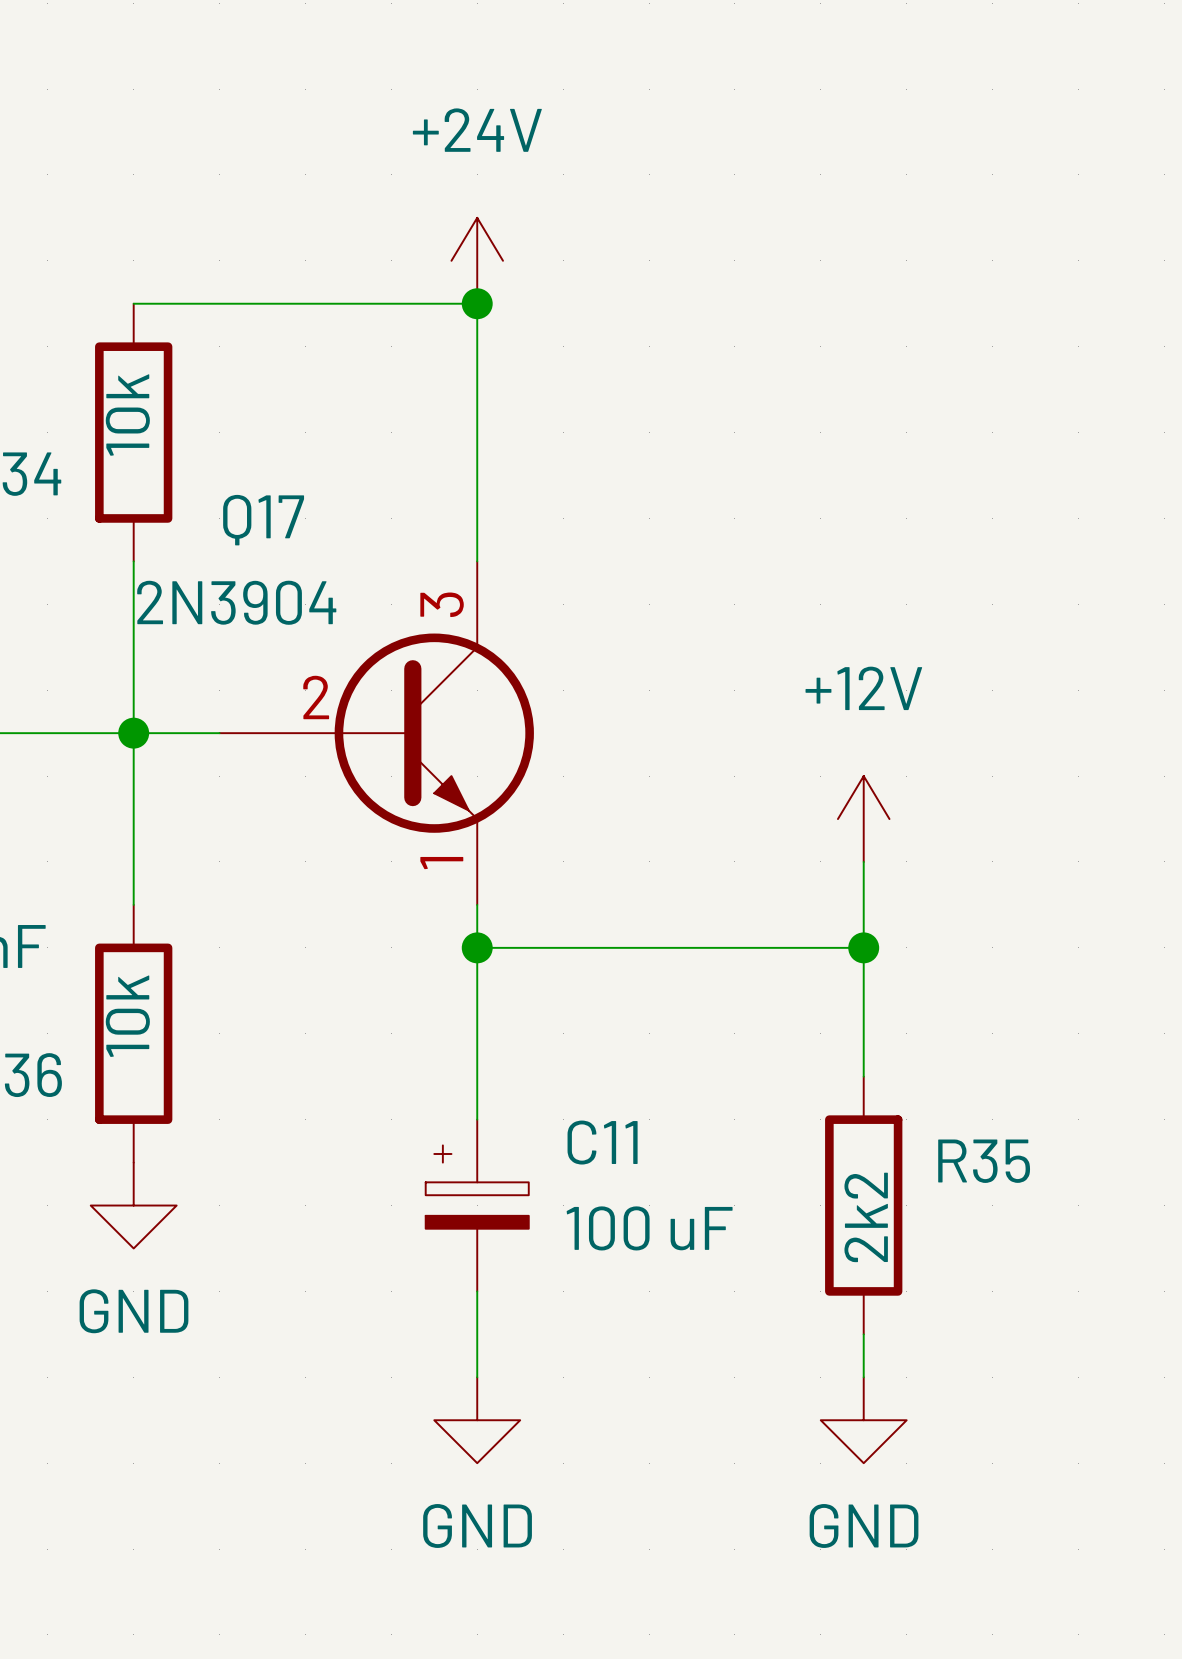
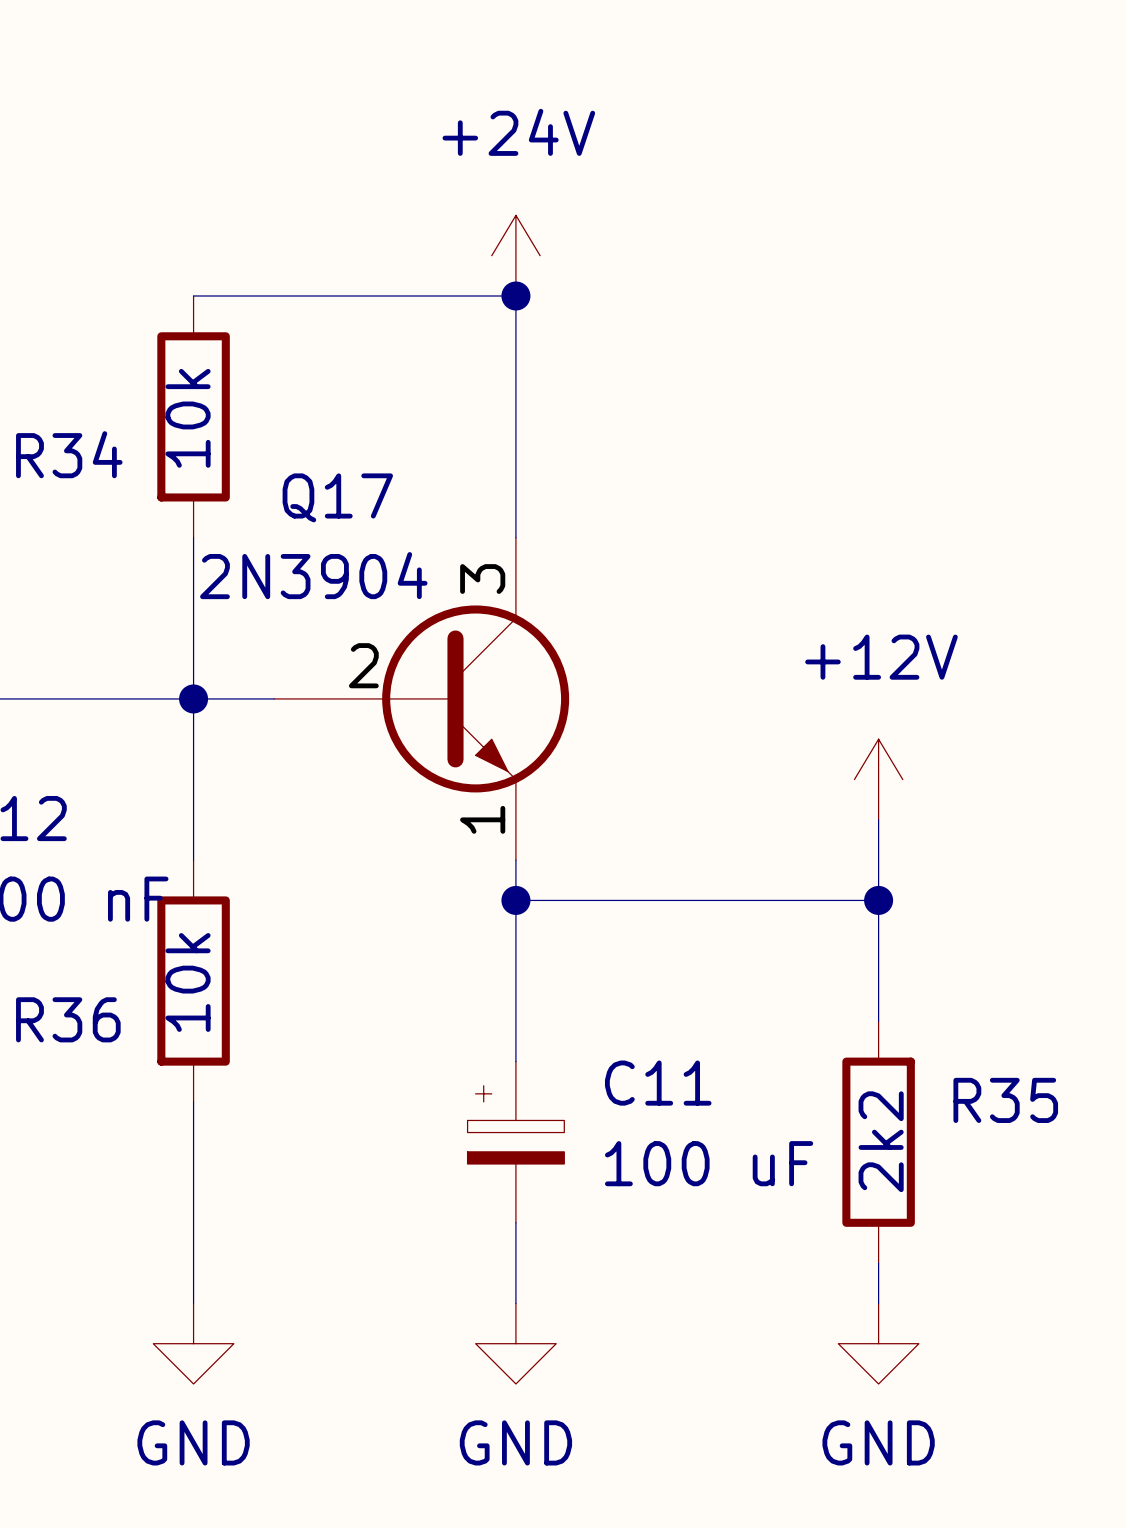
wire: none -> (193, 1101) (193, 1303)
power symbol position: GND (133, 1205) -> GND (193, 1343)

